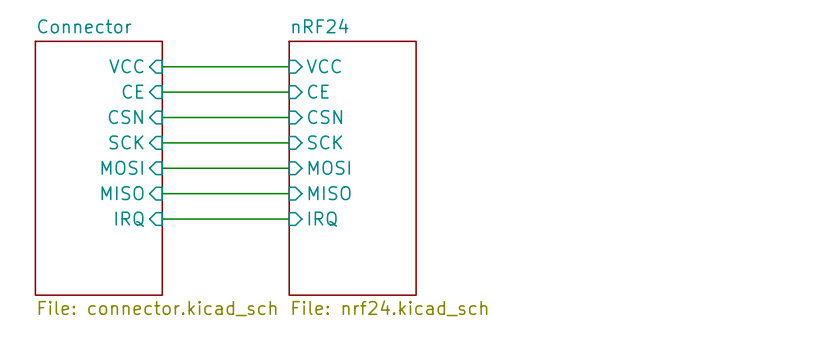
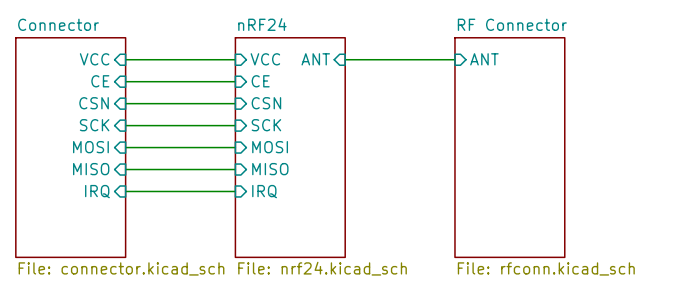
sheet pin: none -> ANT (315, 59)
wire: none -> (345, 59) (454, 59)
sheet pin: none -> ANT (484, 59)
sheet RF Connector: none -> File: rfconn.kicad_sch (509, 147)

